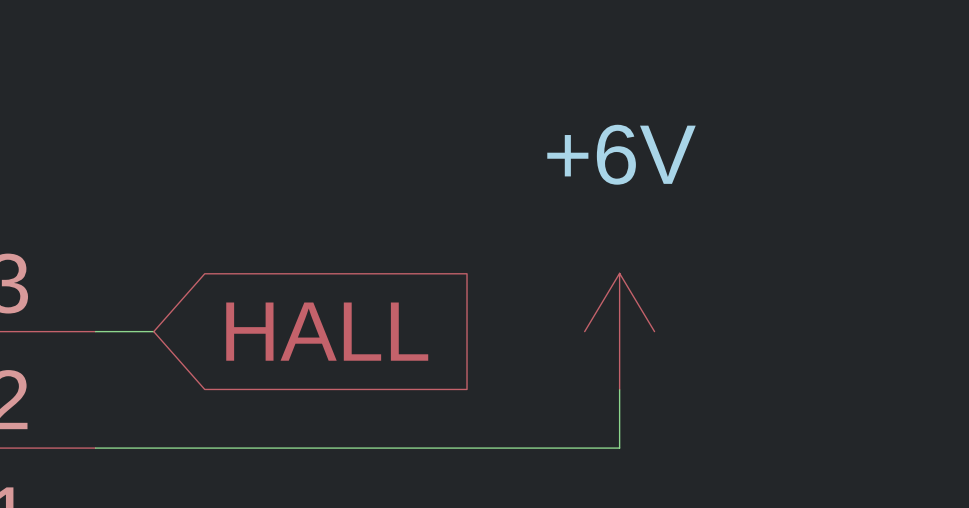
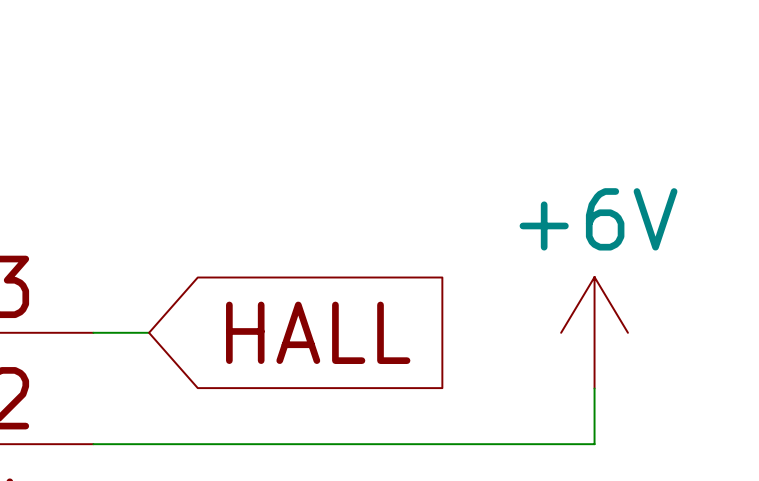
power symbol text position: +6V (621, 154) -> +6V (598, 219)

